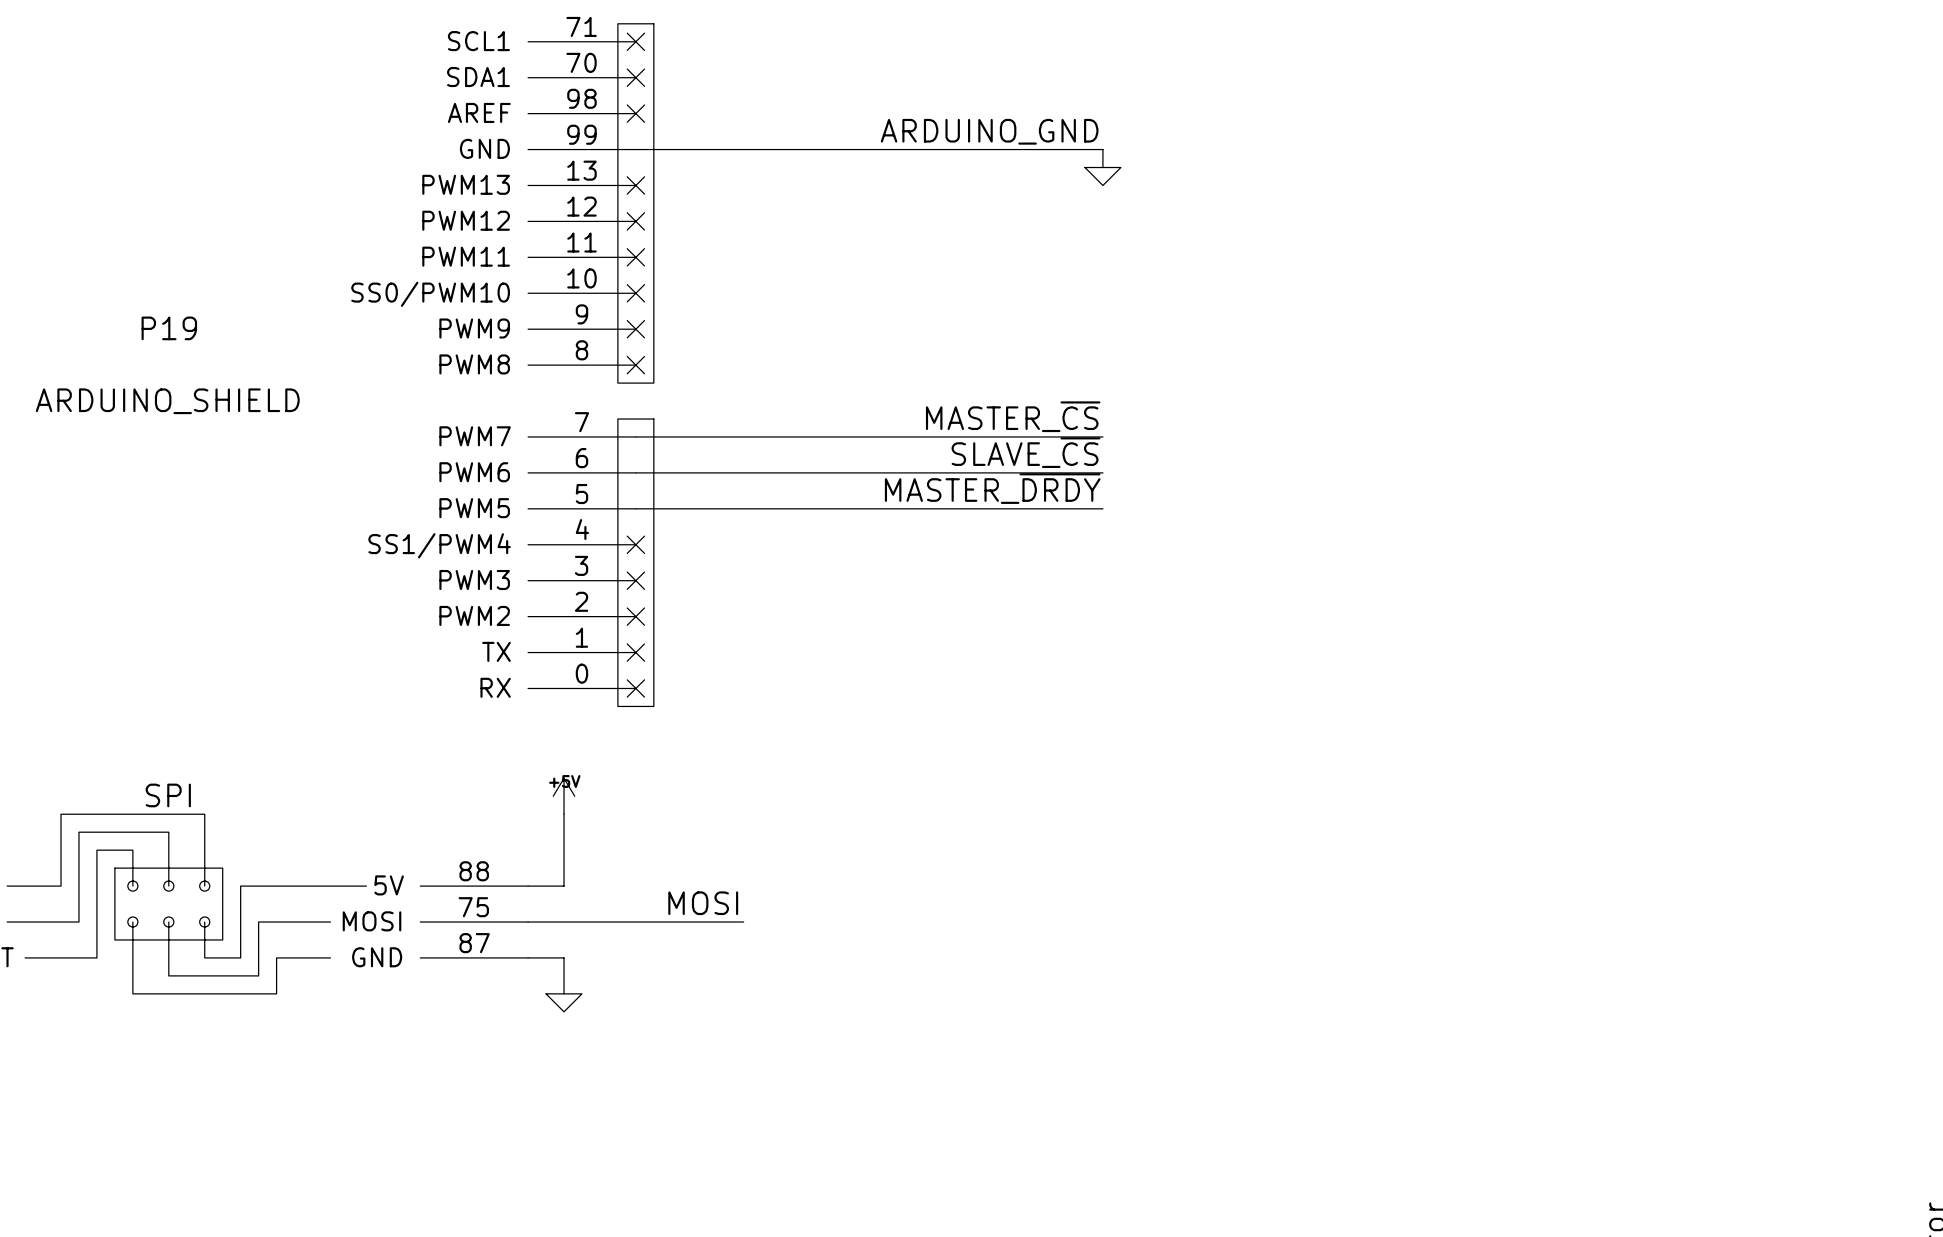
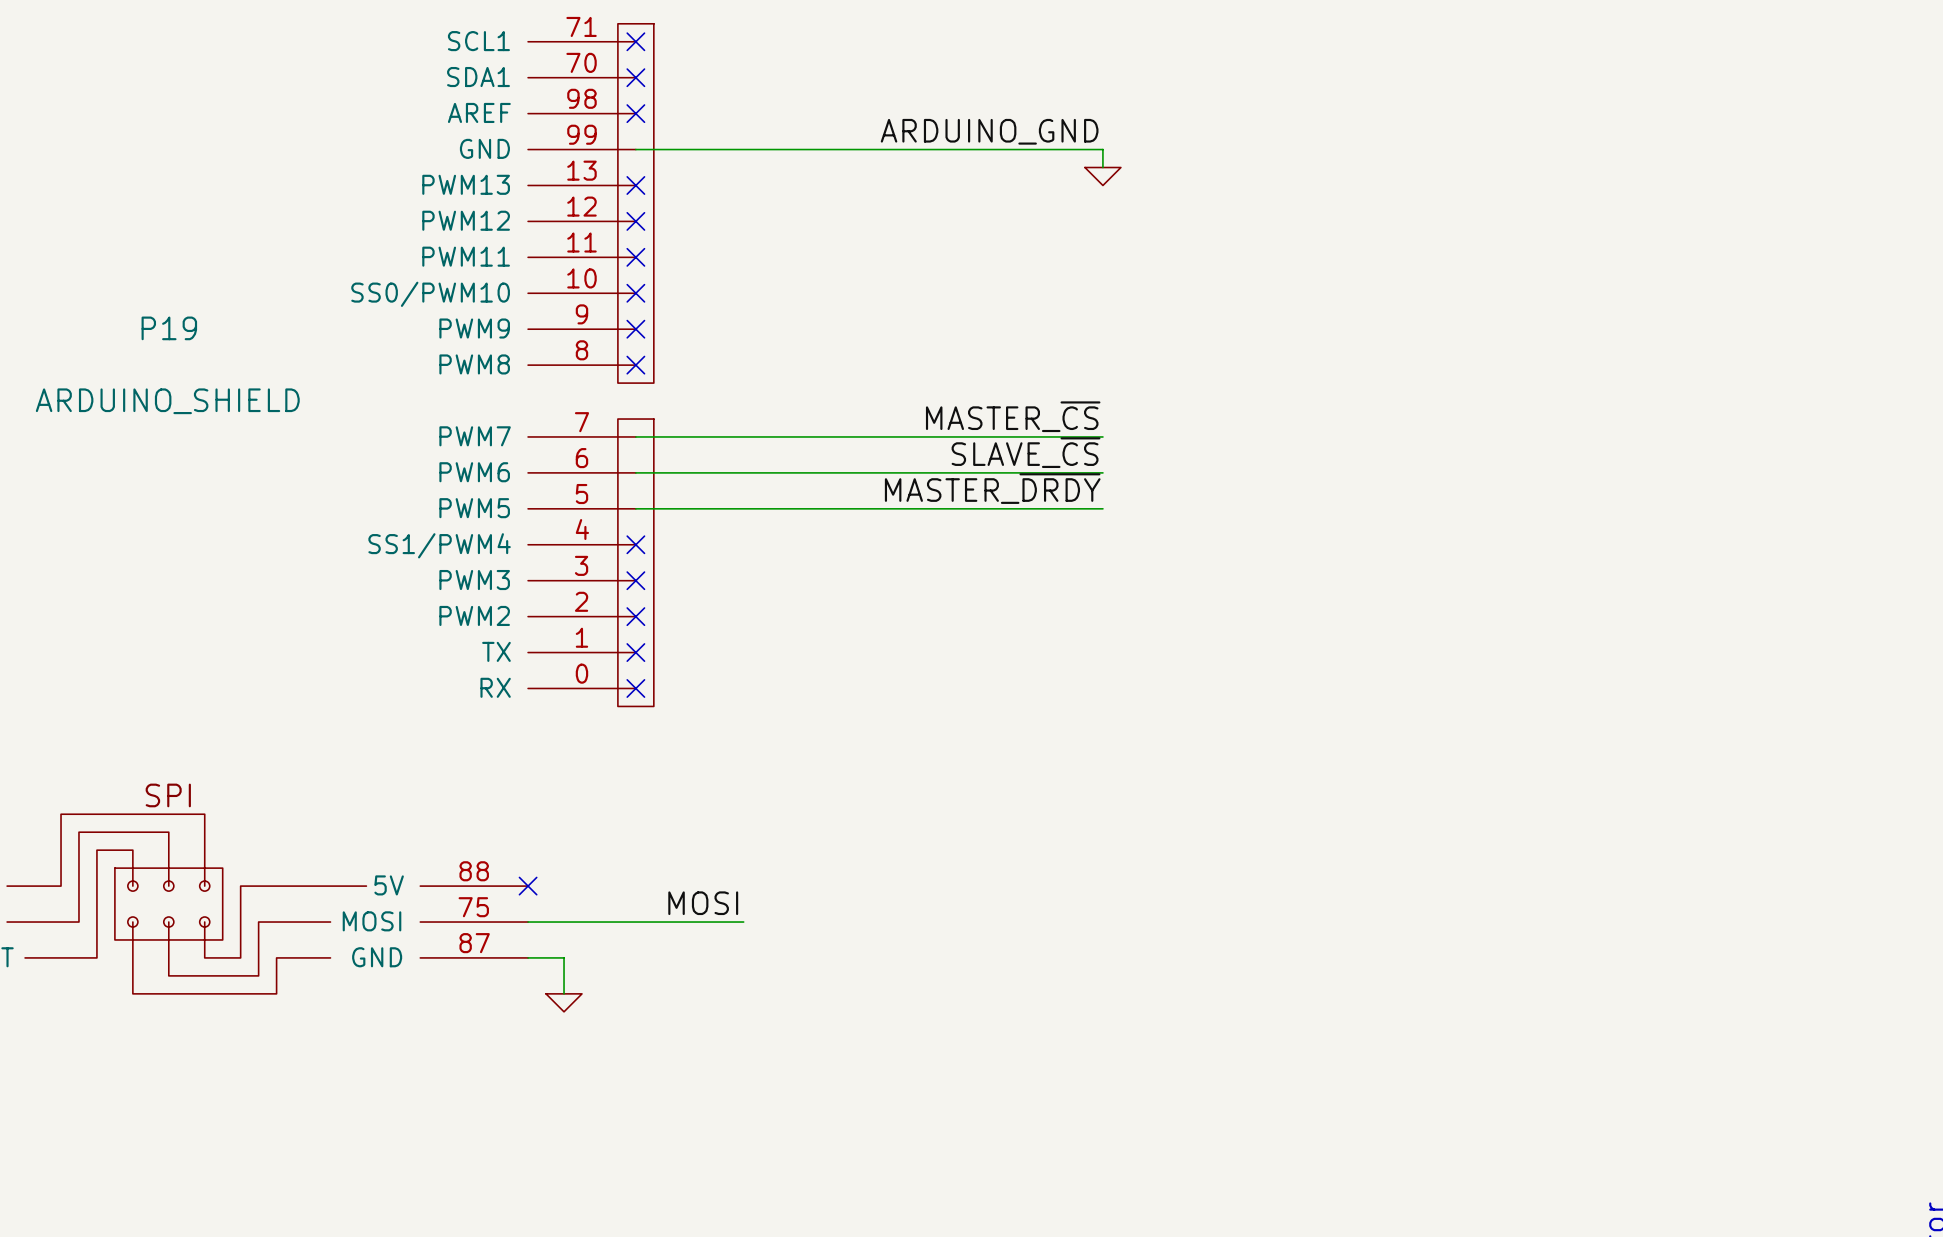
power symbol: +5V (564, 796) -> none
wire: (564, 814) (564, 886) (528, 886) -> none
no-connect mark: none -> (528, 886)

